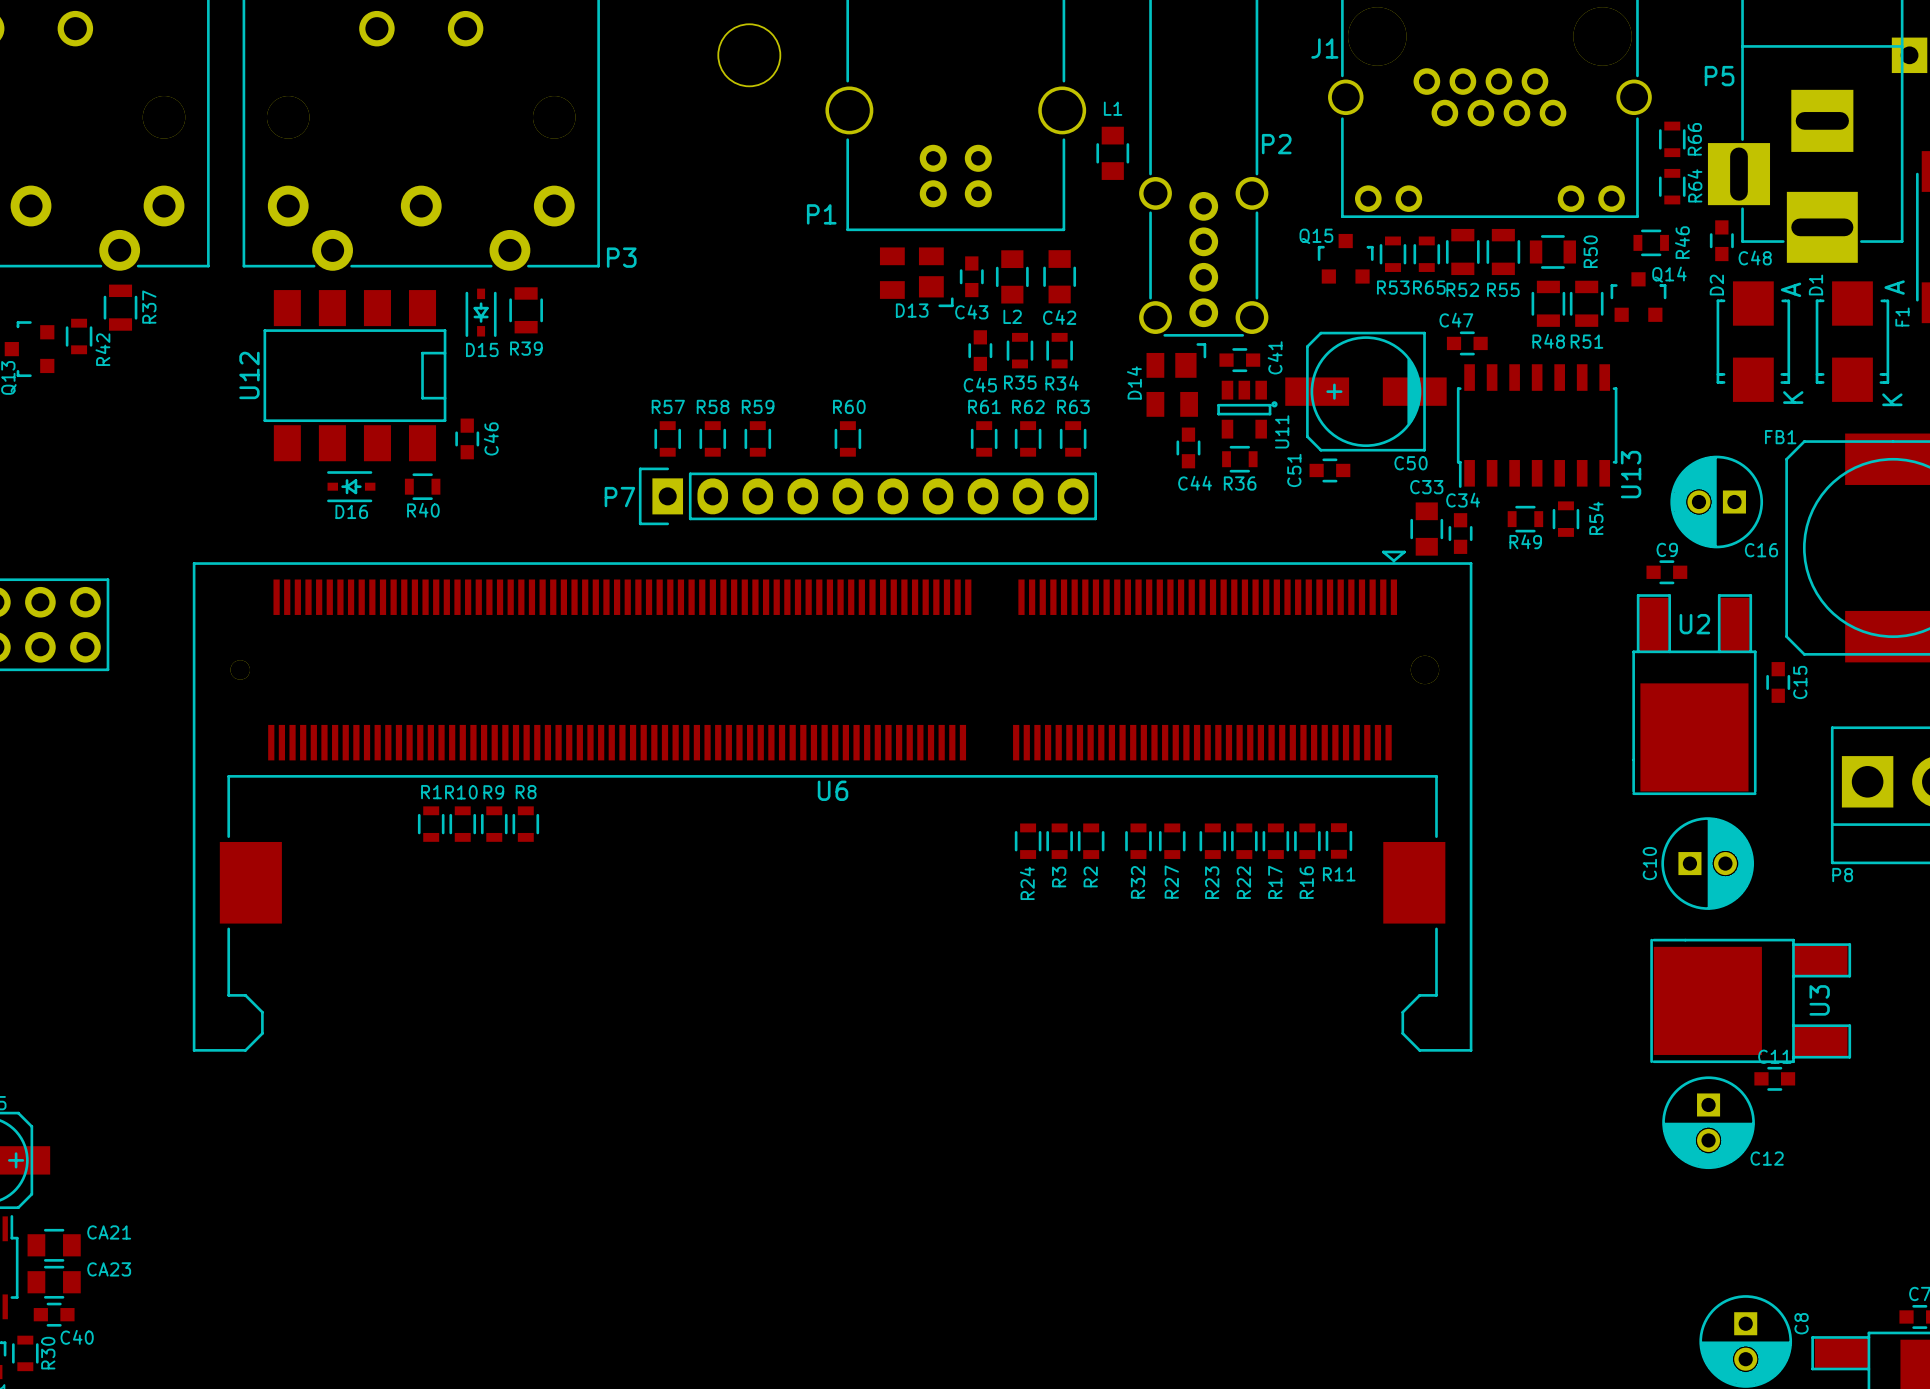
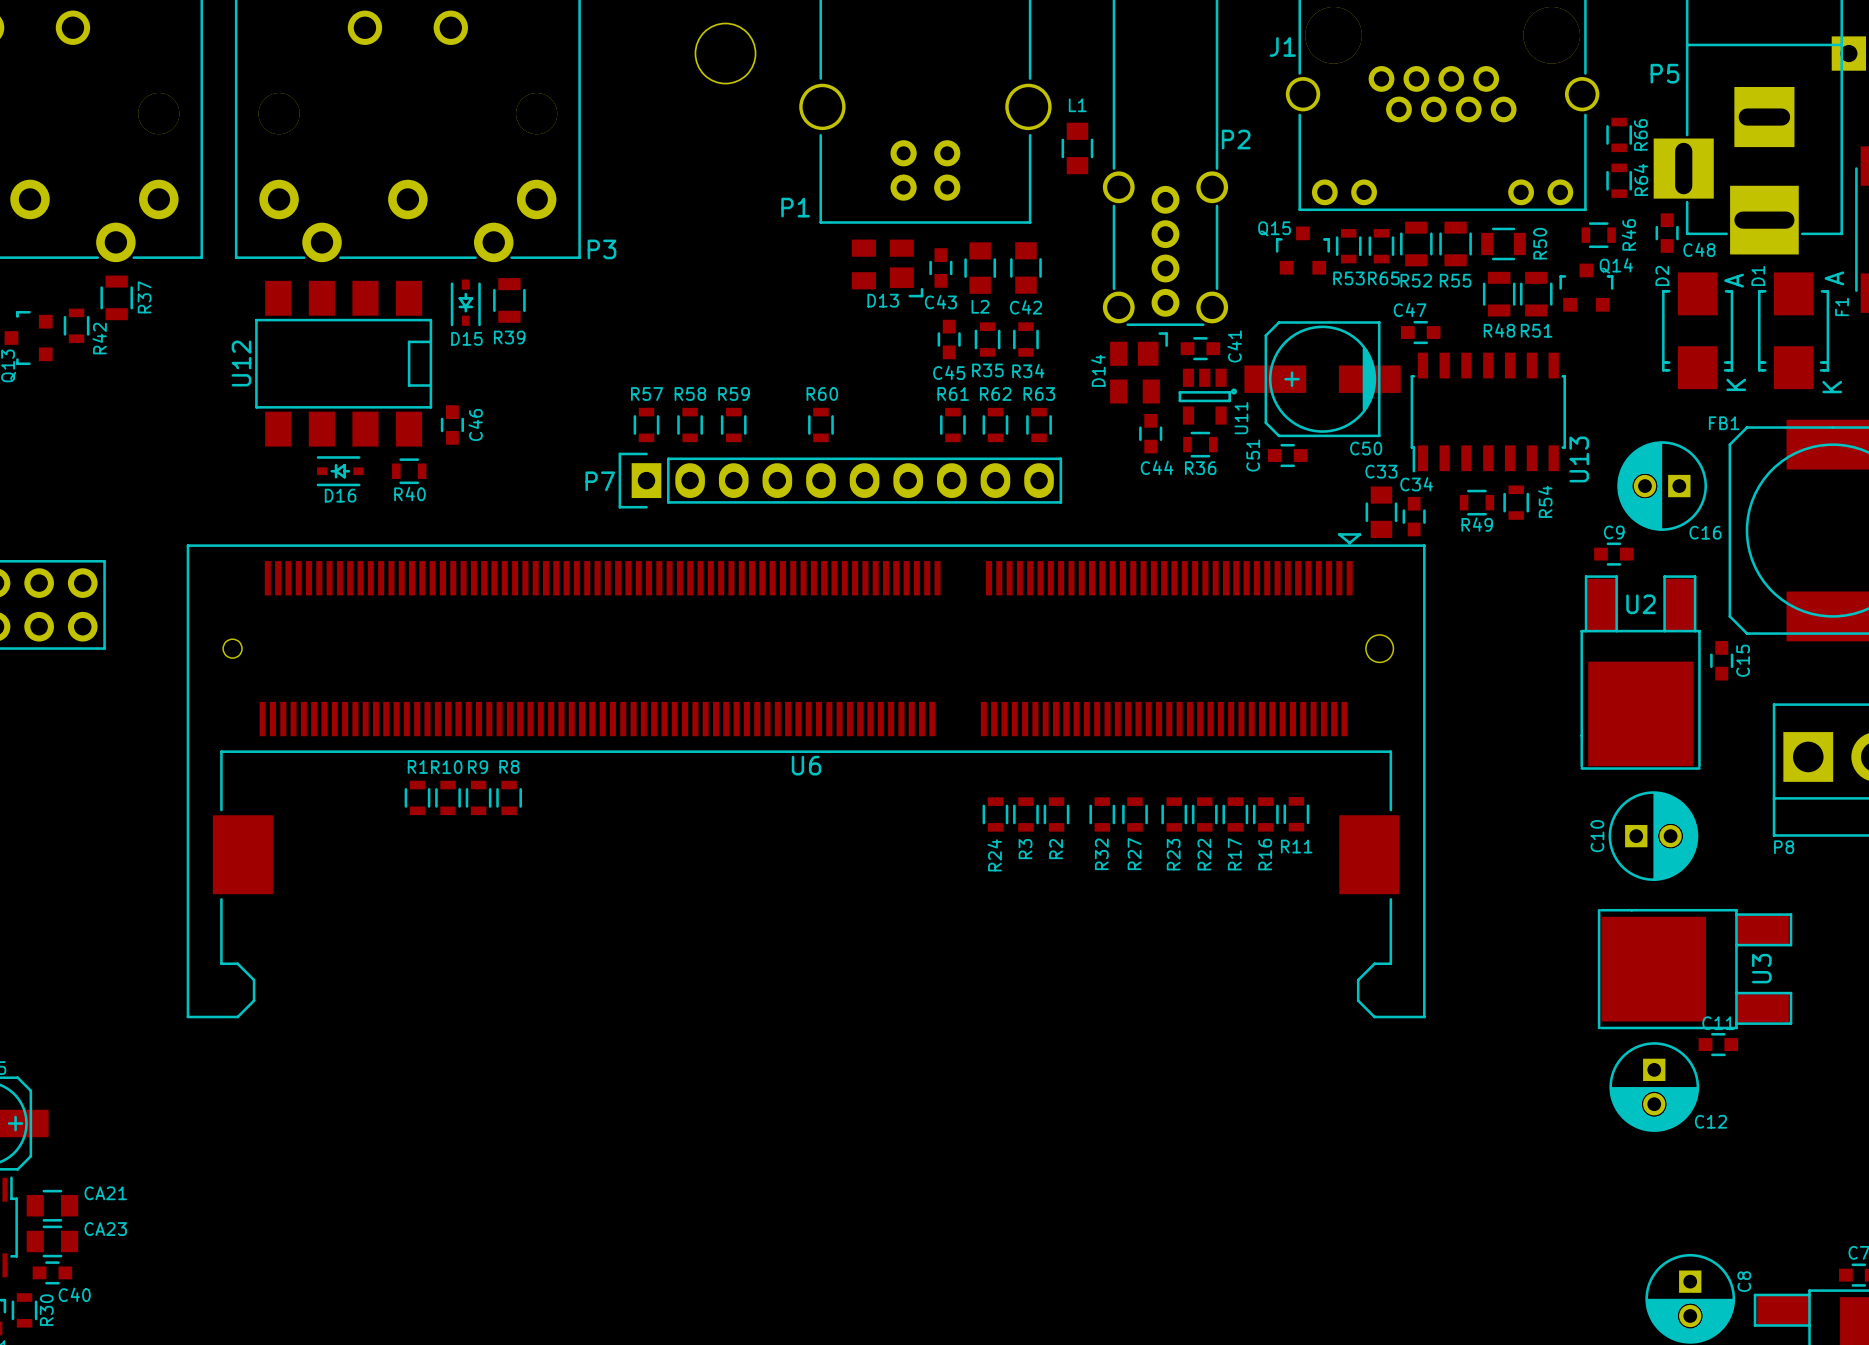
U6 footprint: [192, 550, 1473, 1052] -> [186, 533, 1426, 1019]

